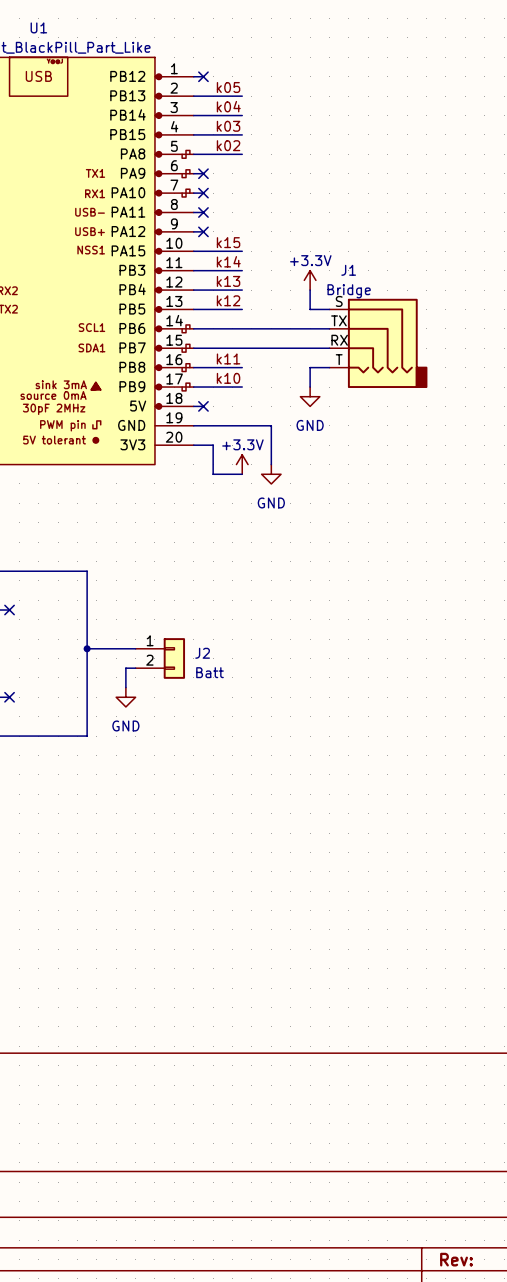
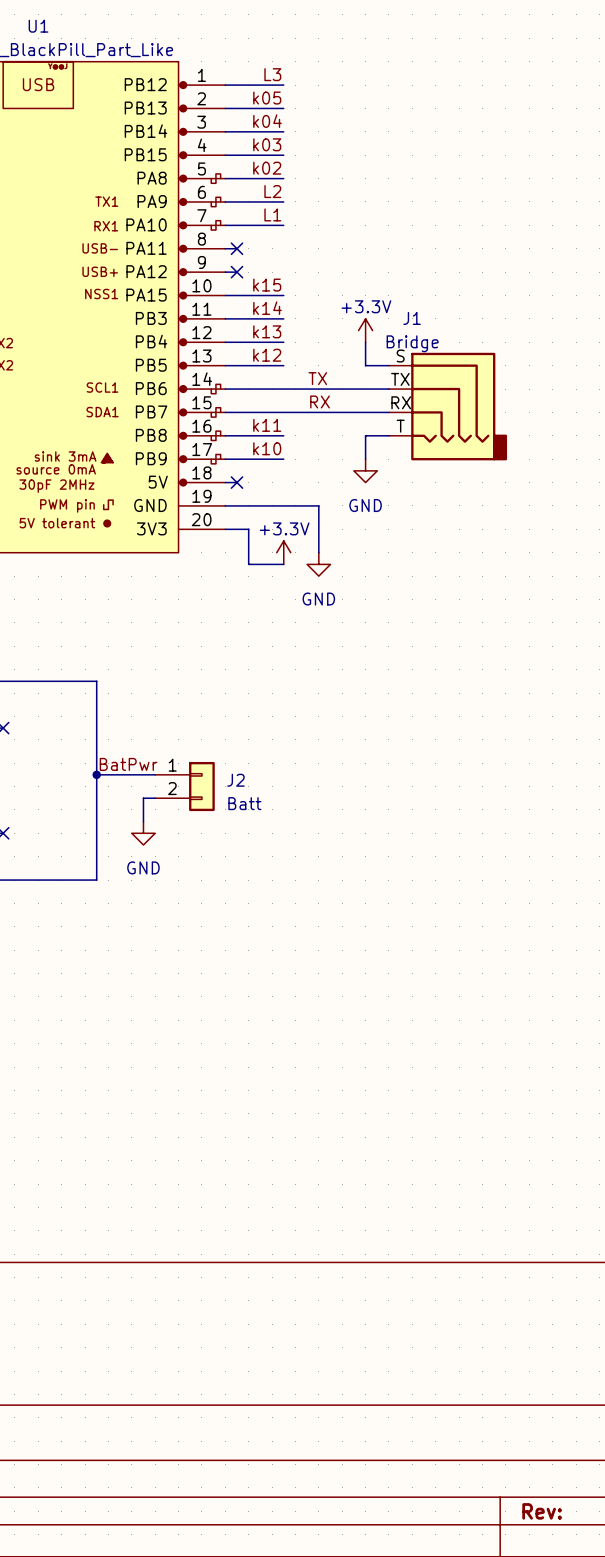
label: none -> L3 (272, 74)
wire: none -> (236, 85) (283, 85)
no-connect mark: (203, 76) -> none
label: none -> L2 (272, 191)
wire: none -> (236, 201) (283, 201)
no-connect mark: (203, 173) -> none
label: none -> L1 (272, 214)
wire: none -> (236, 225) (283, 225)
no-connect mark: (203, 193) -> none
label: none -> TX (317, 378)
label: none -> RX (320, 401)
label: none -> BatPwr (128, 764)

